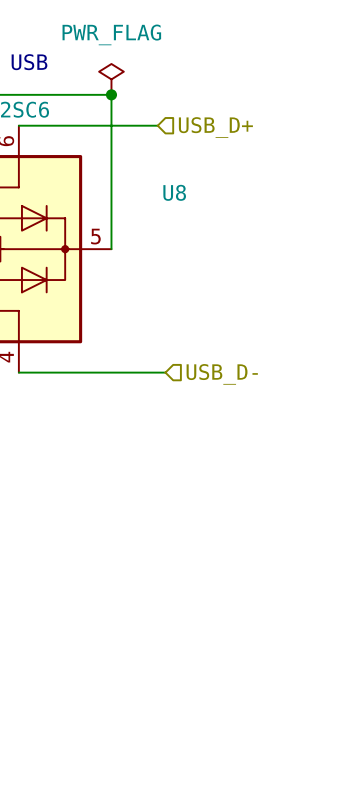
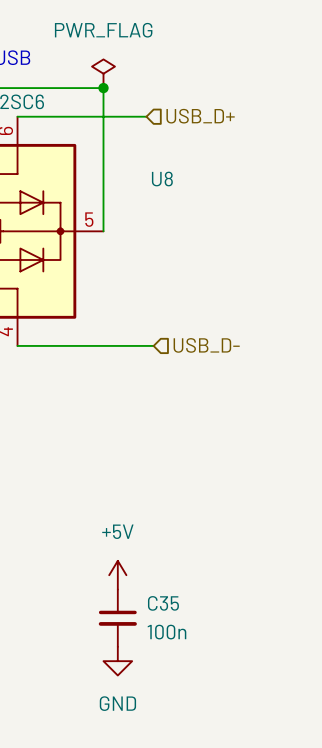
power symbol: none -> +5V (117, 575)
C35: none -> 100n (117, 618)
power symbol: none -> GND (117, 661)

